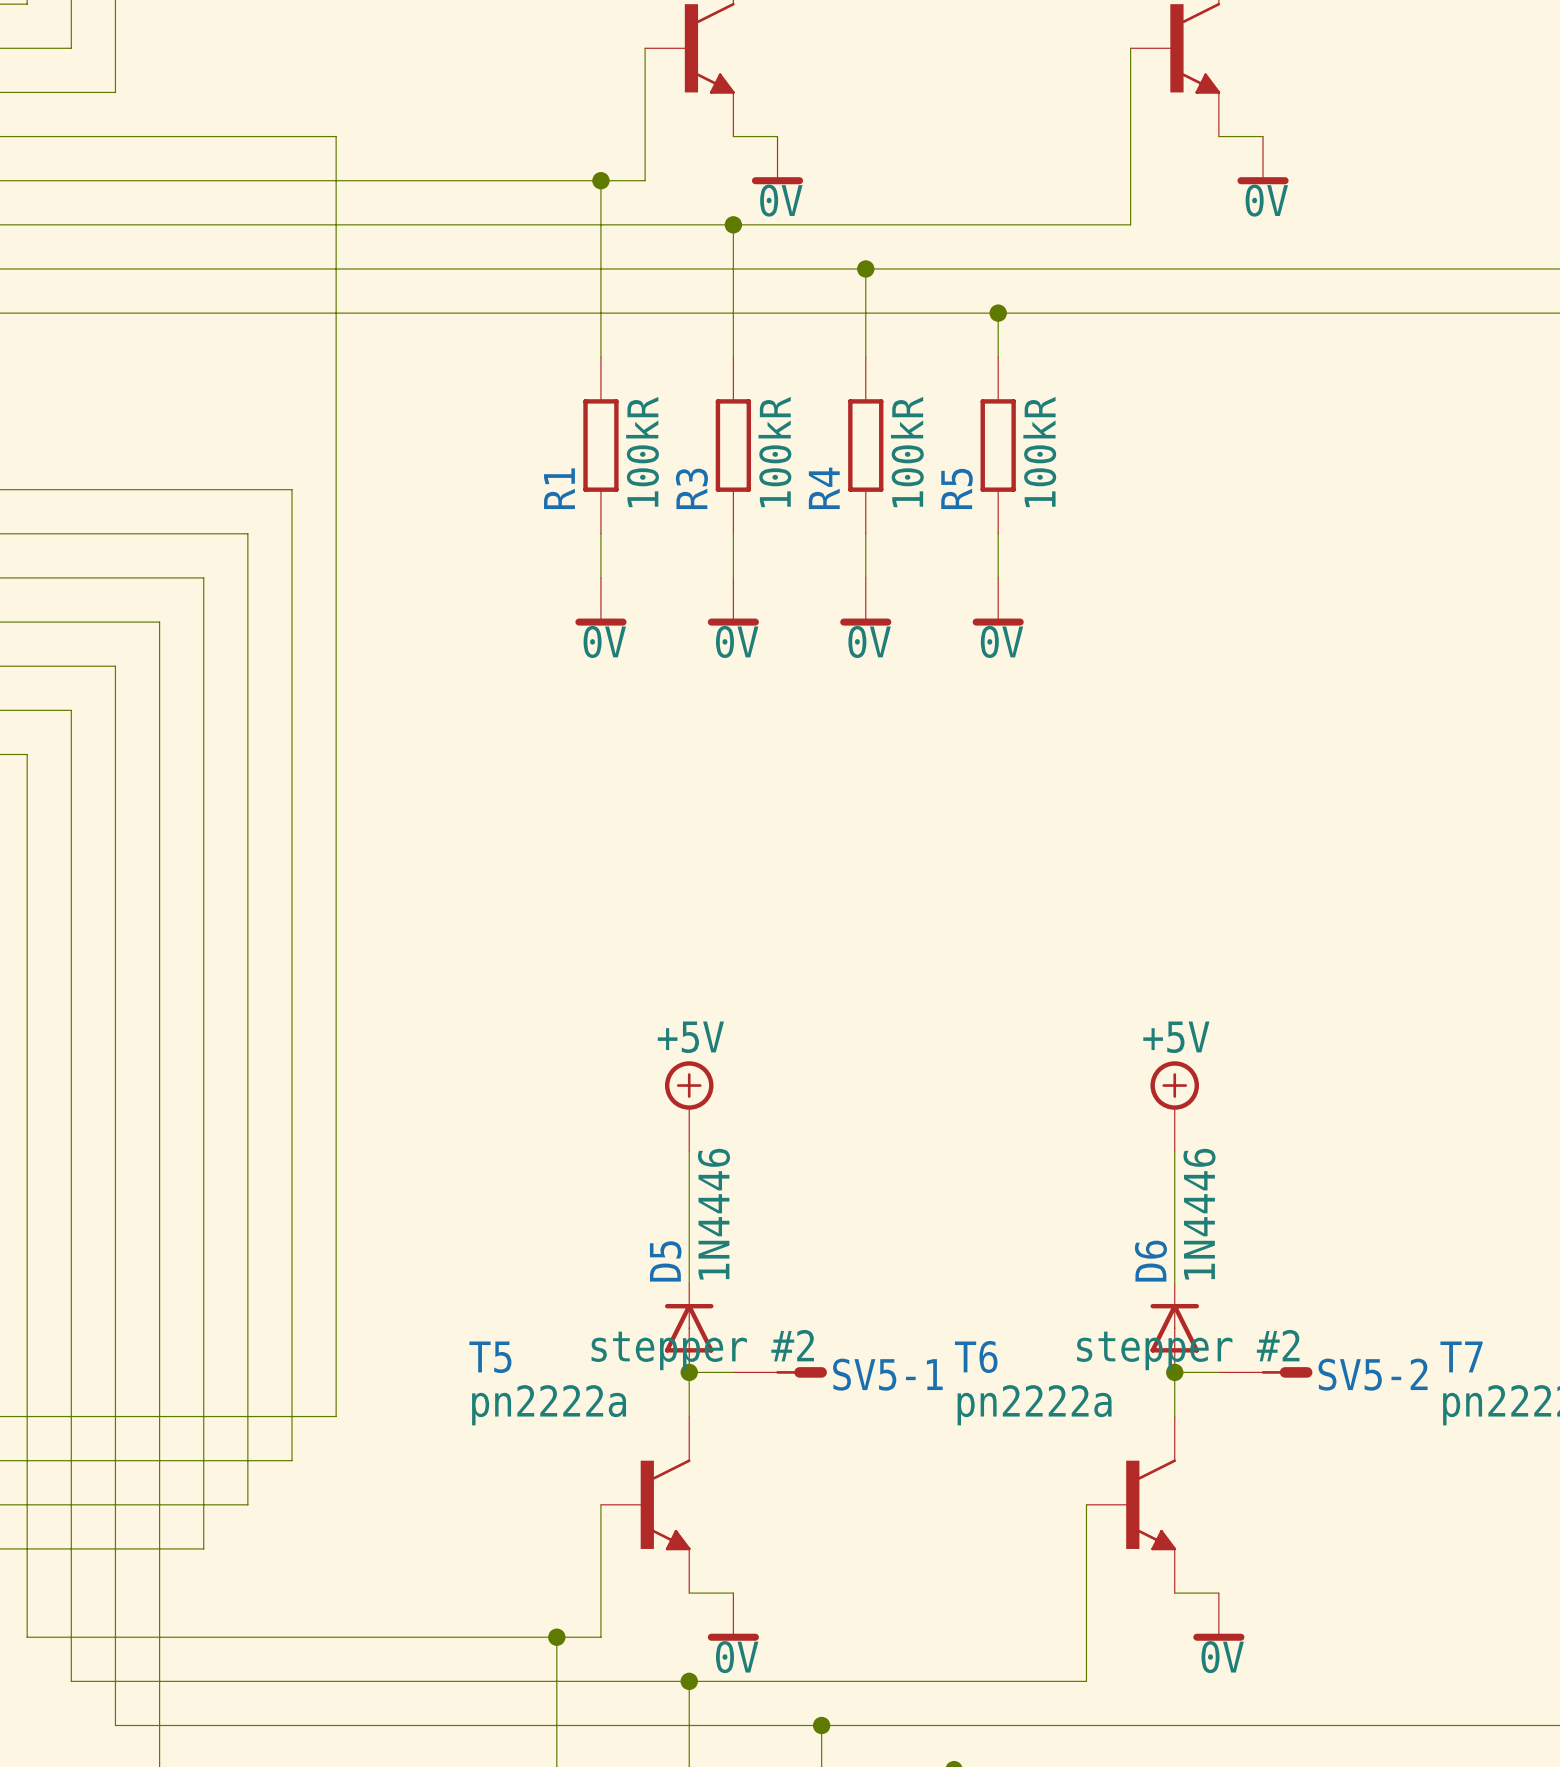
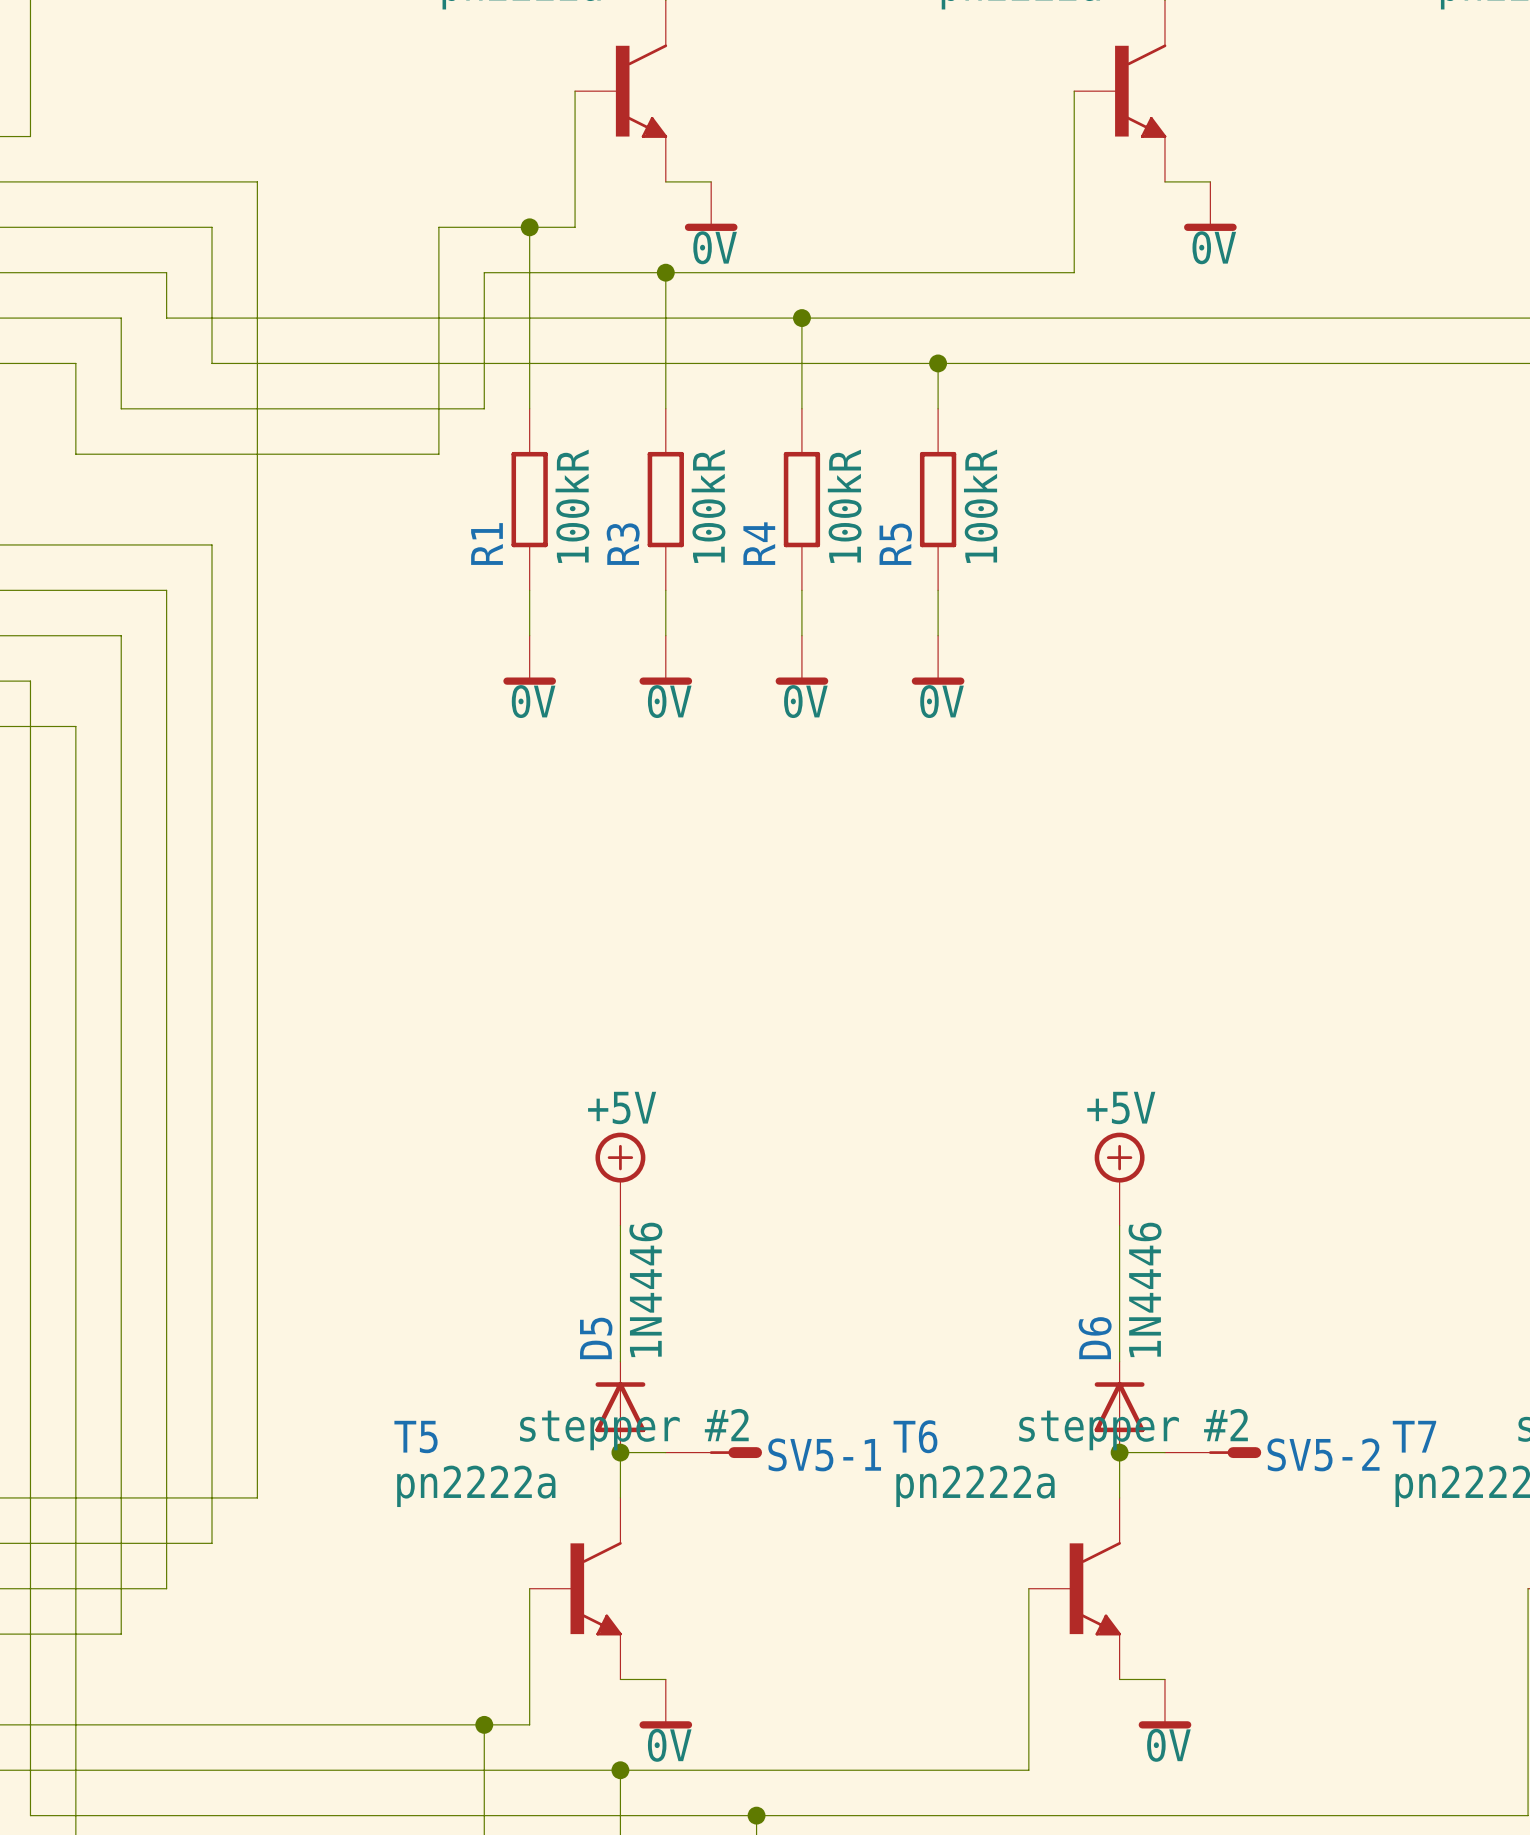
wire: (292, 180) (512, 180) -> (75, 363) (75, 454) (438, 454) (438, 227)
wire: (247, 224) (556, 224) -> (121, 318) (121, 408) (484, 408) (484, 272)
wire: (203, 268) (247, 268) -> (166, 272) (166, 318)
wire: (159, 313) (292, 313) -> (212, 227) (212, 363)
wire: (115, 622) (159, 622) (159, 666) -> (30, 681) (30, 726) (75, 726)

